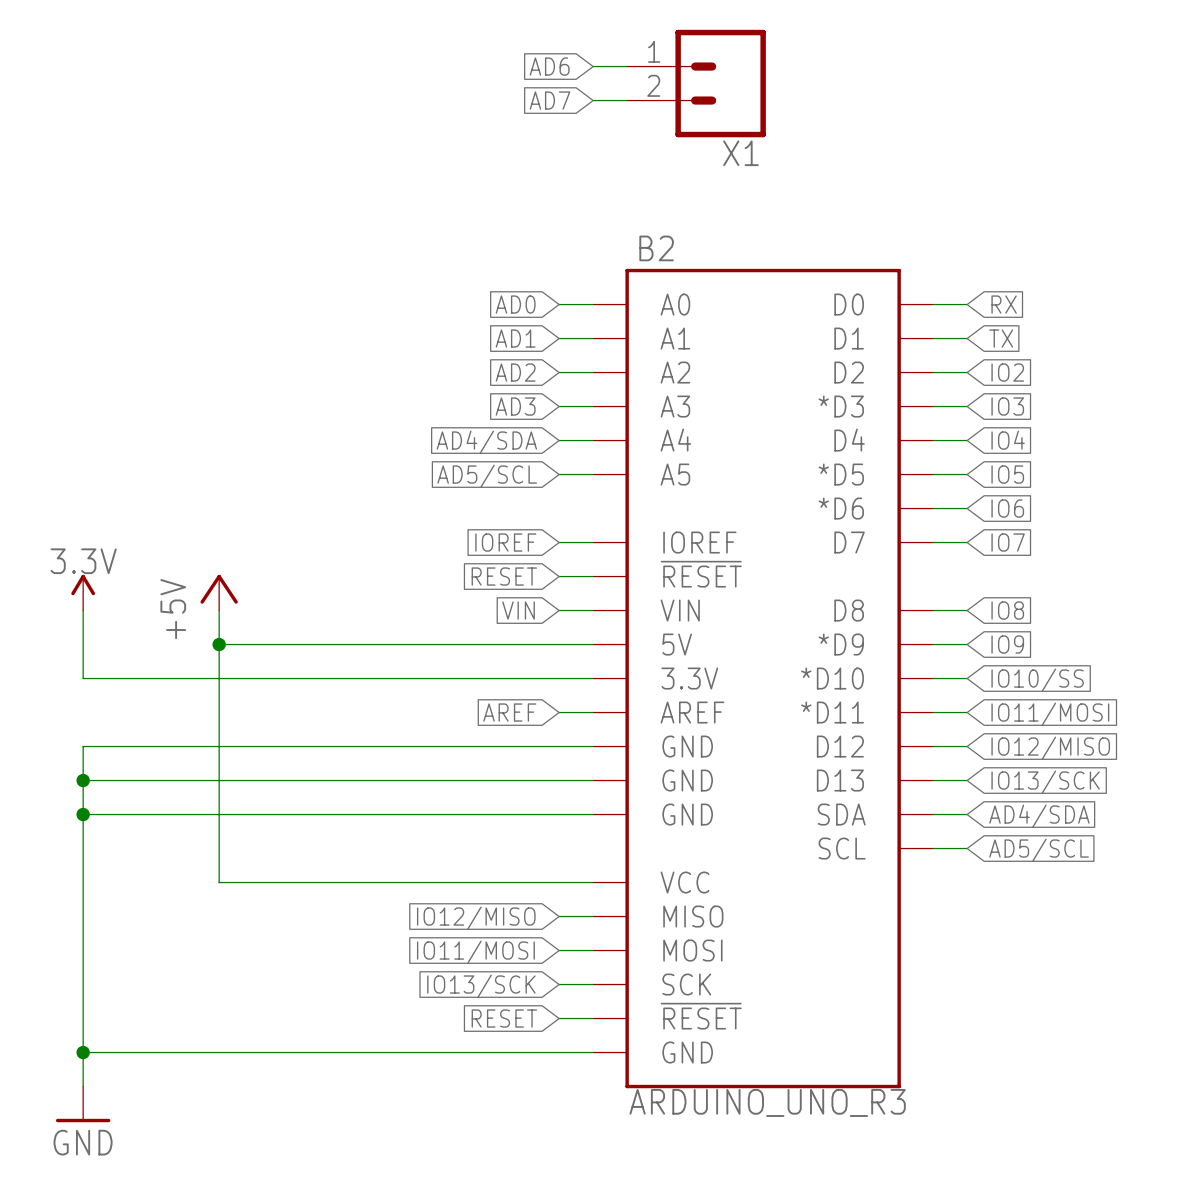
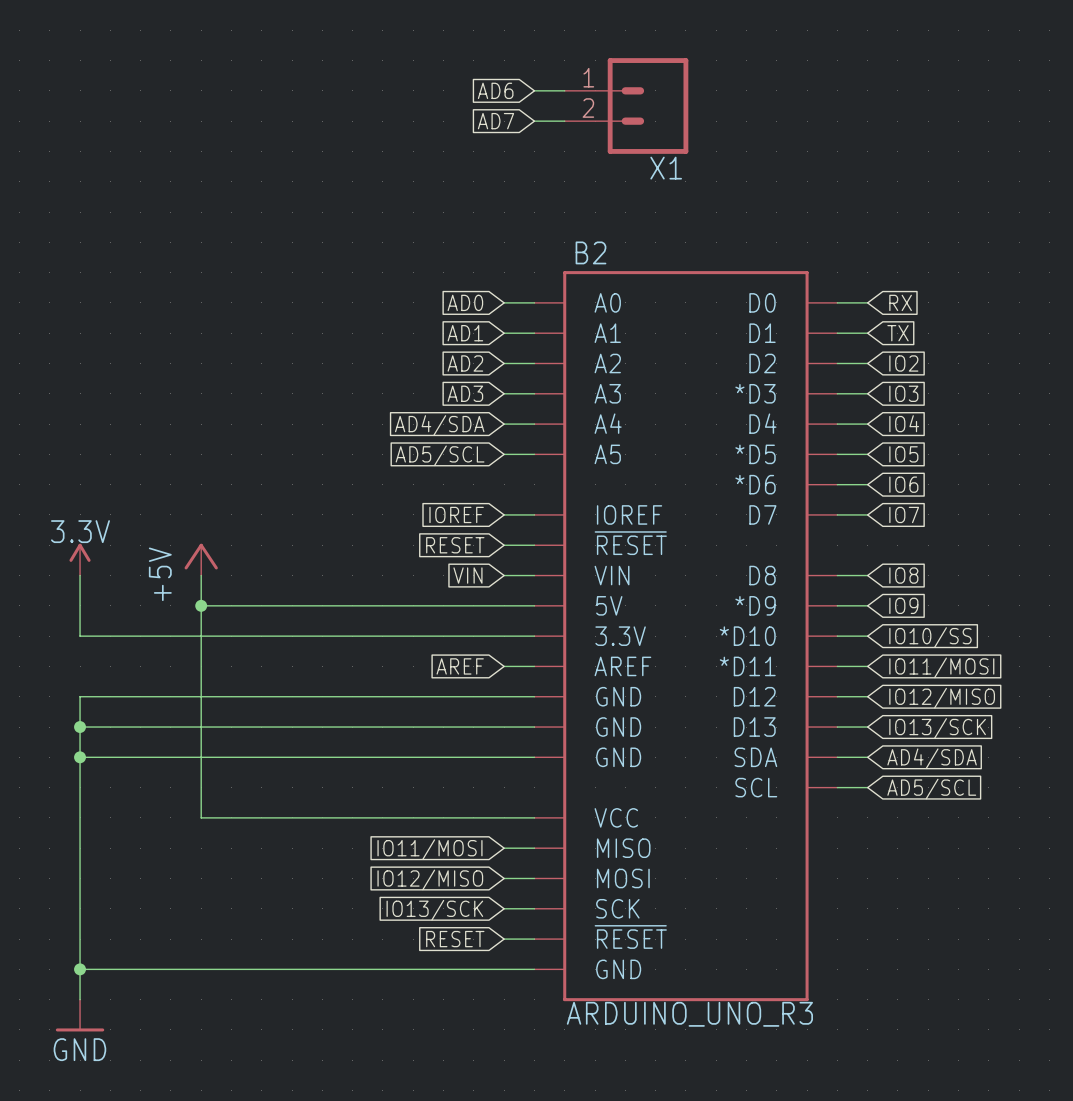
global label: IO12/MISO (476, 918) -> IO11/MOSI (429, 849)
global label: IO11/MOSI (475, 952) -> IO12/MISO (430, 879)

